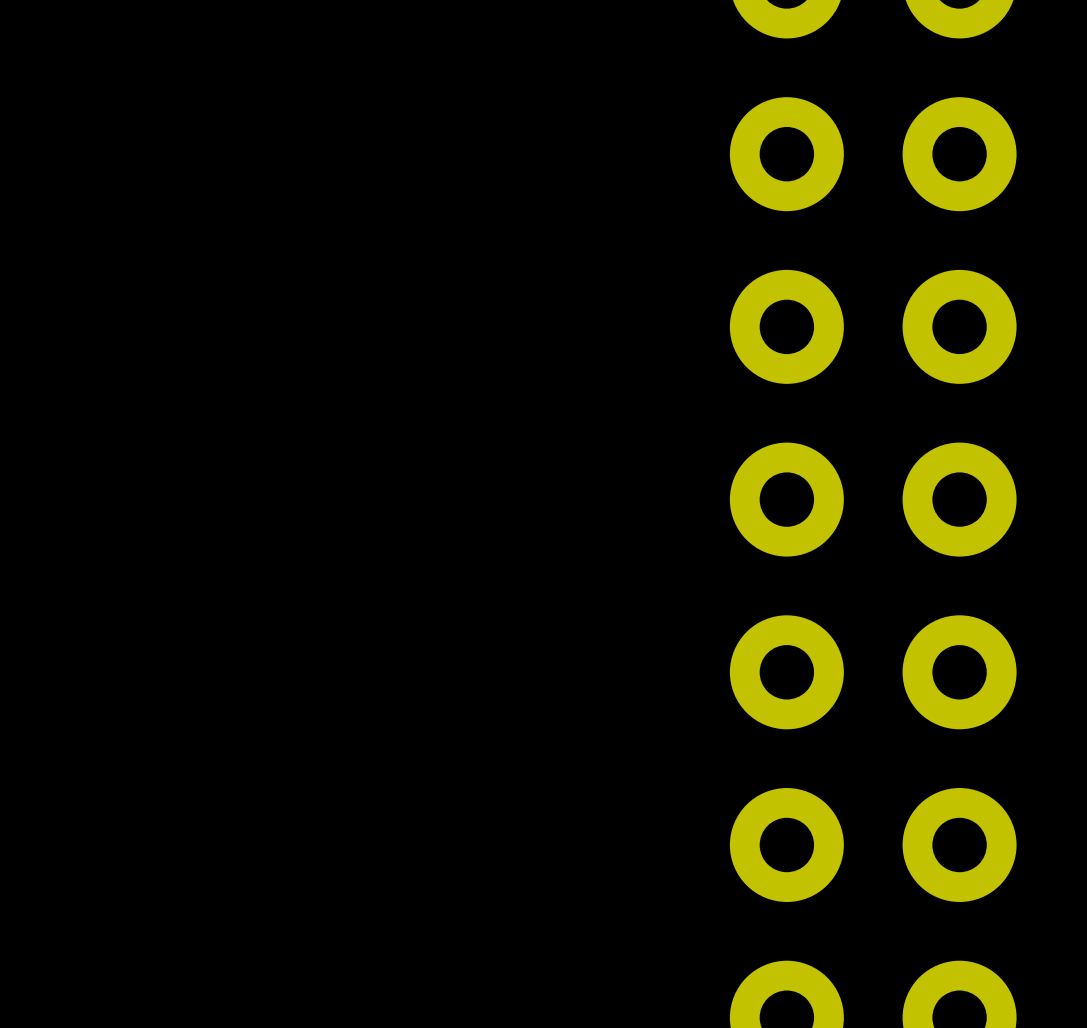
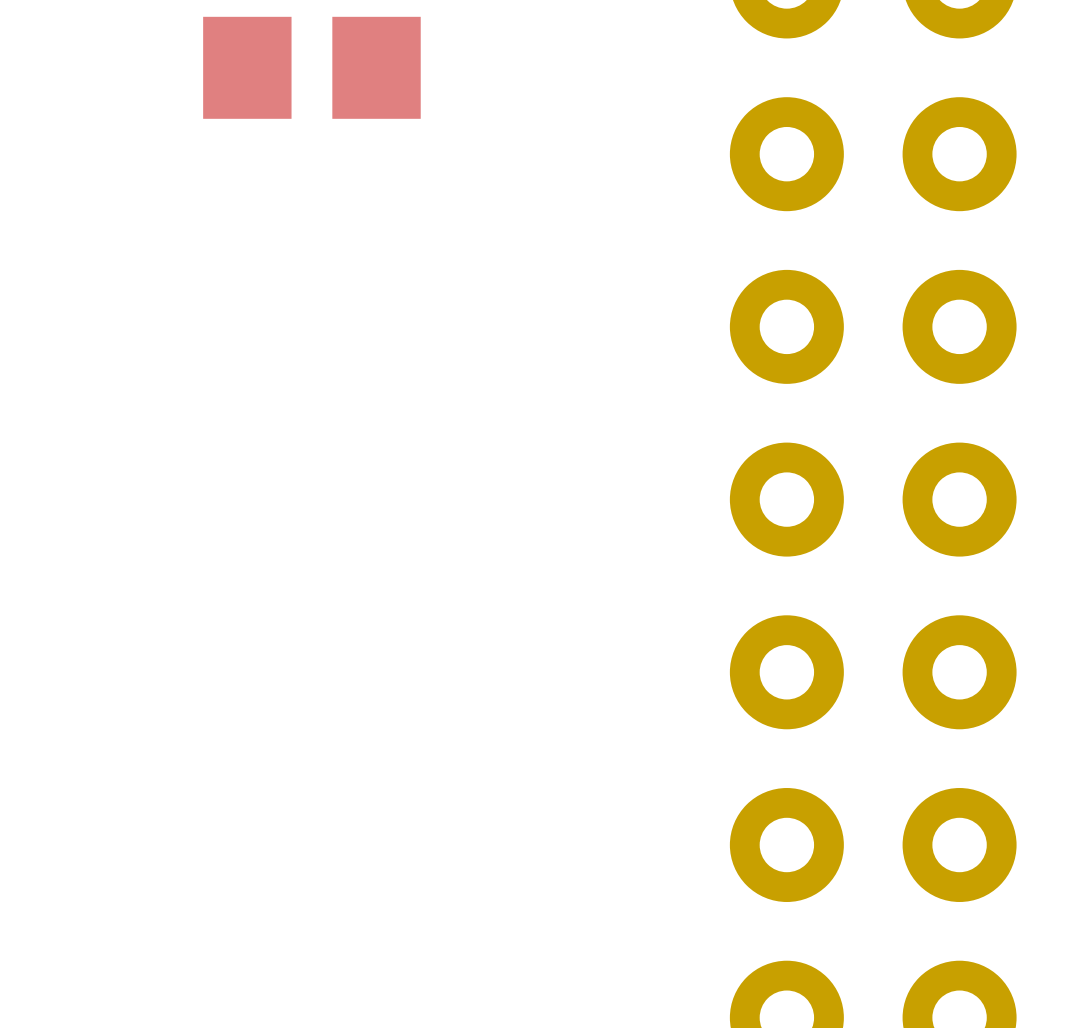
part: none -> (311, 67)

